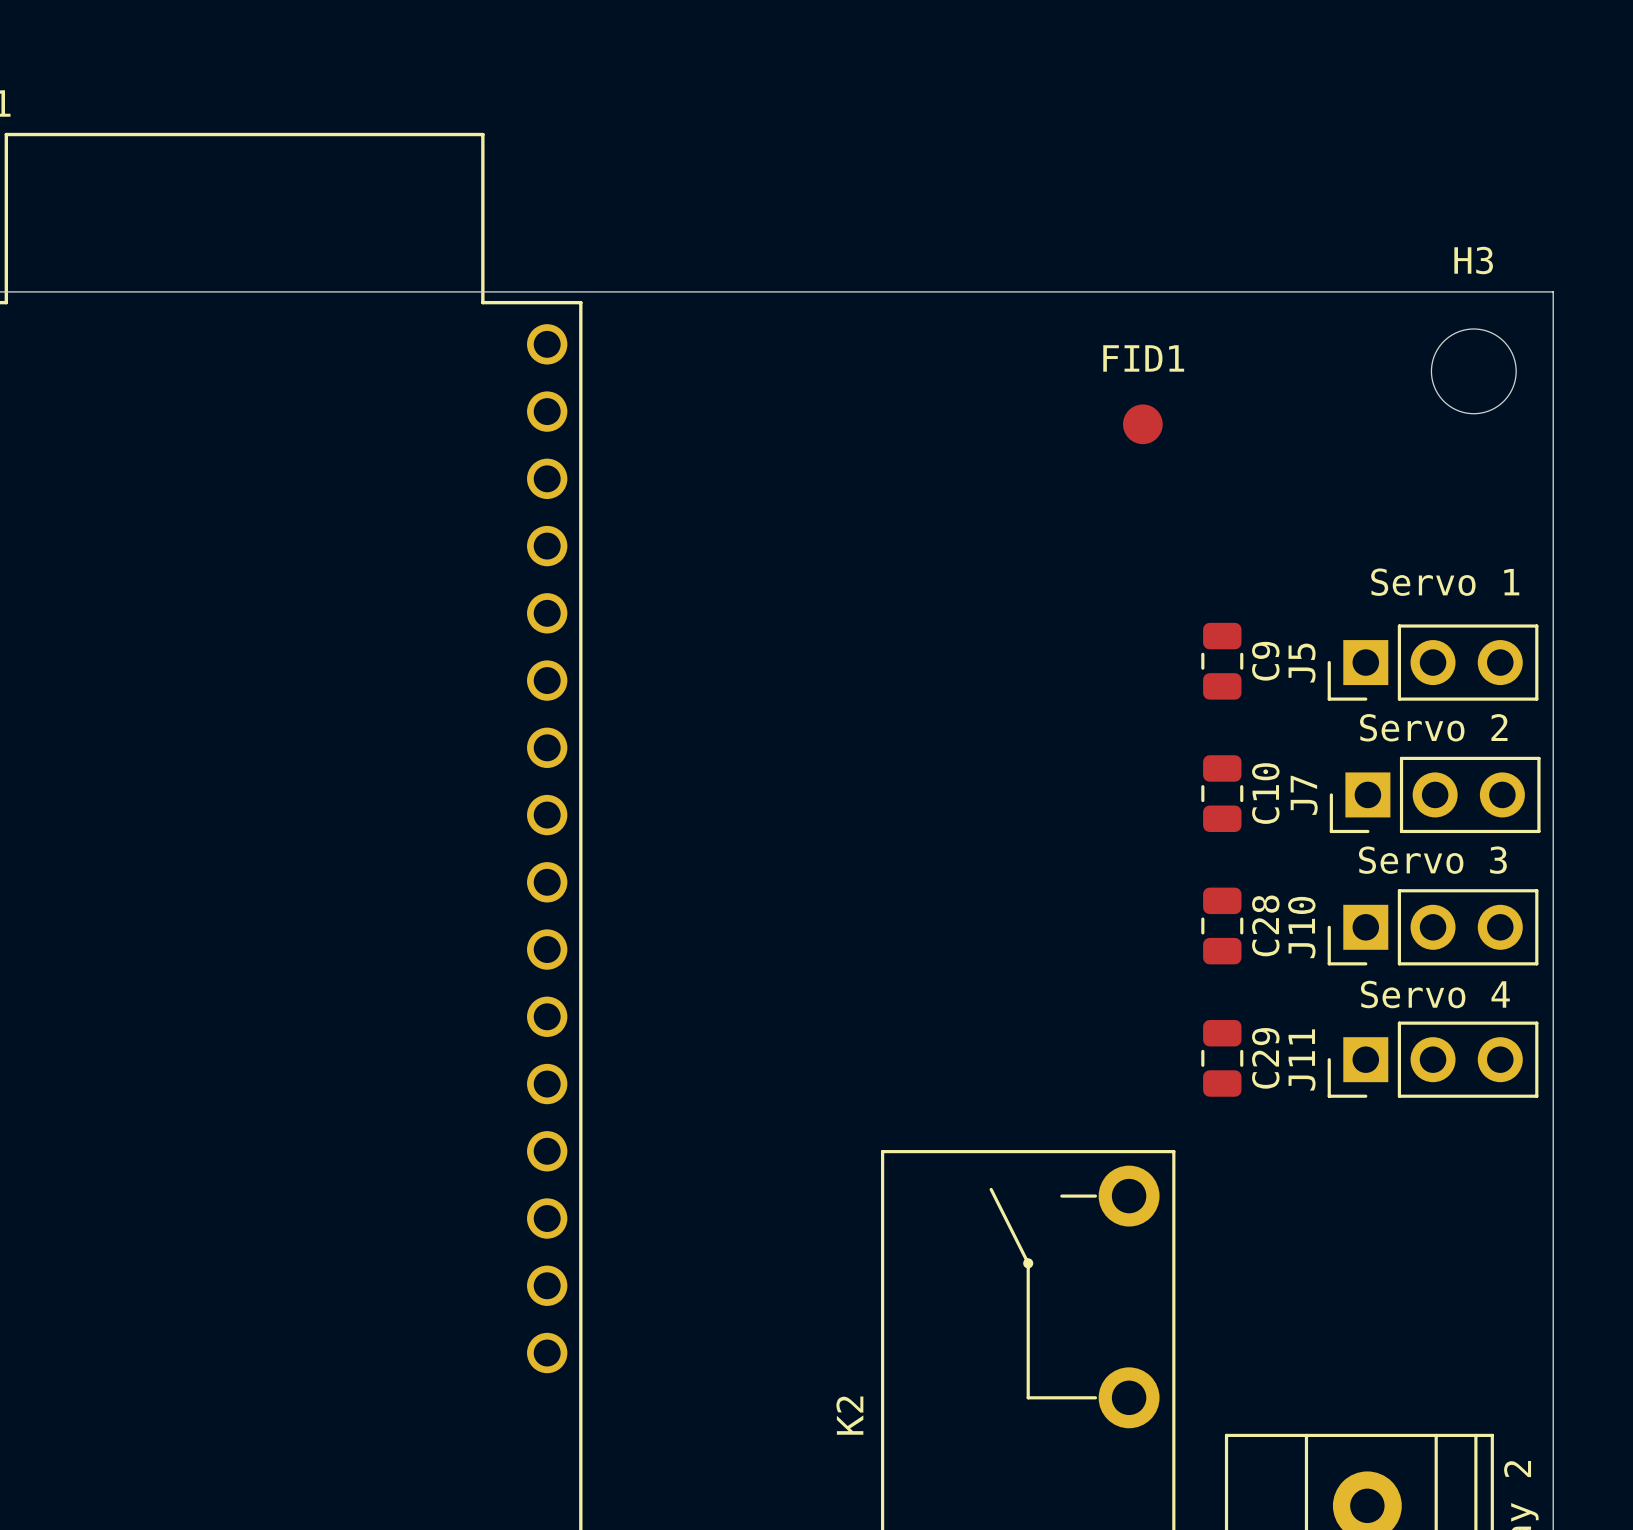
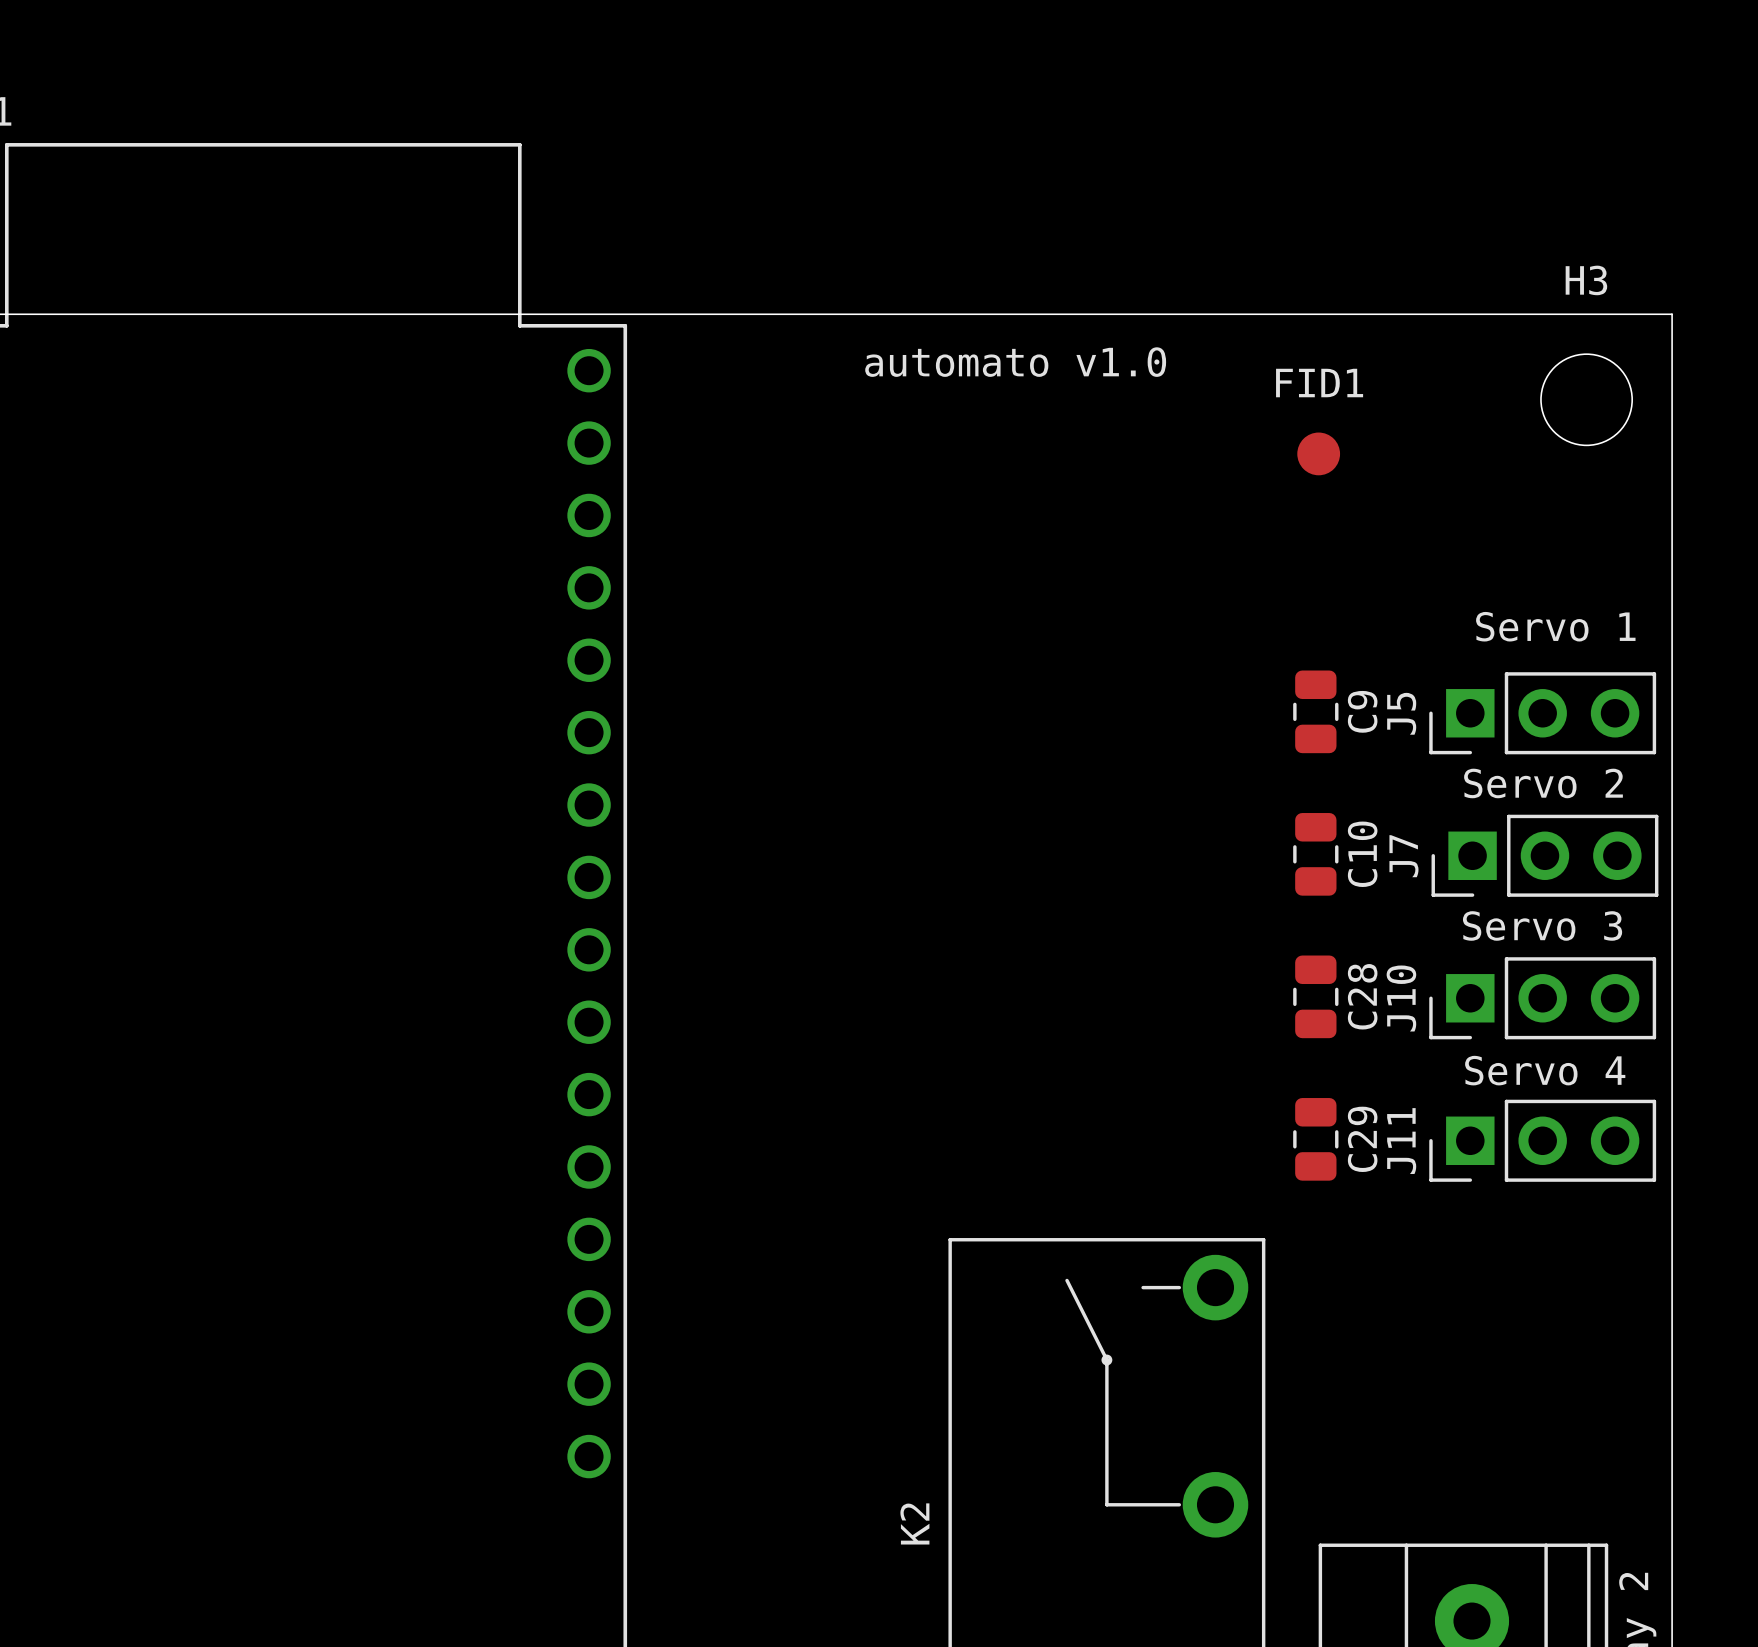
text: none -> automato v1.0 (1015, 362)
FID1 position: (1142, 424) -> (1318, 453)

